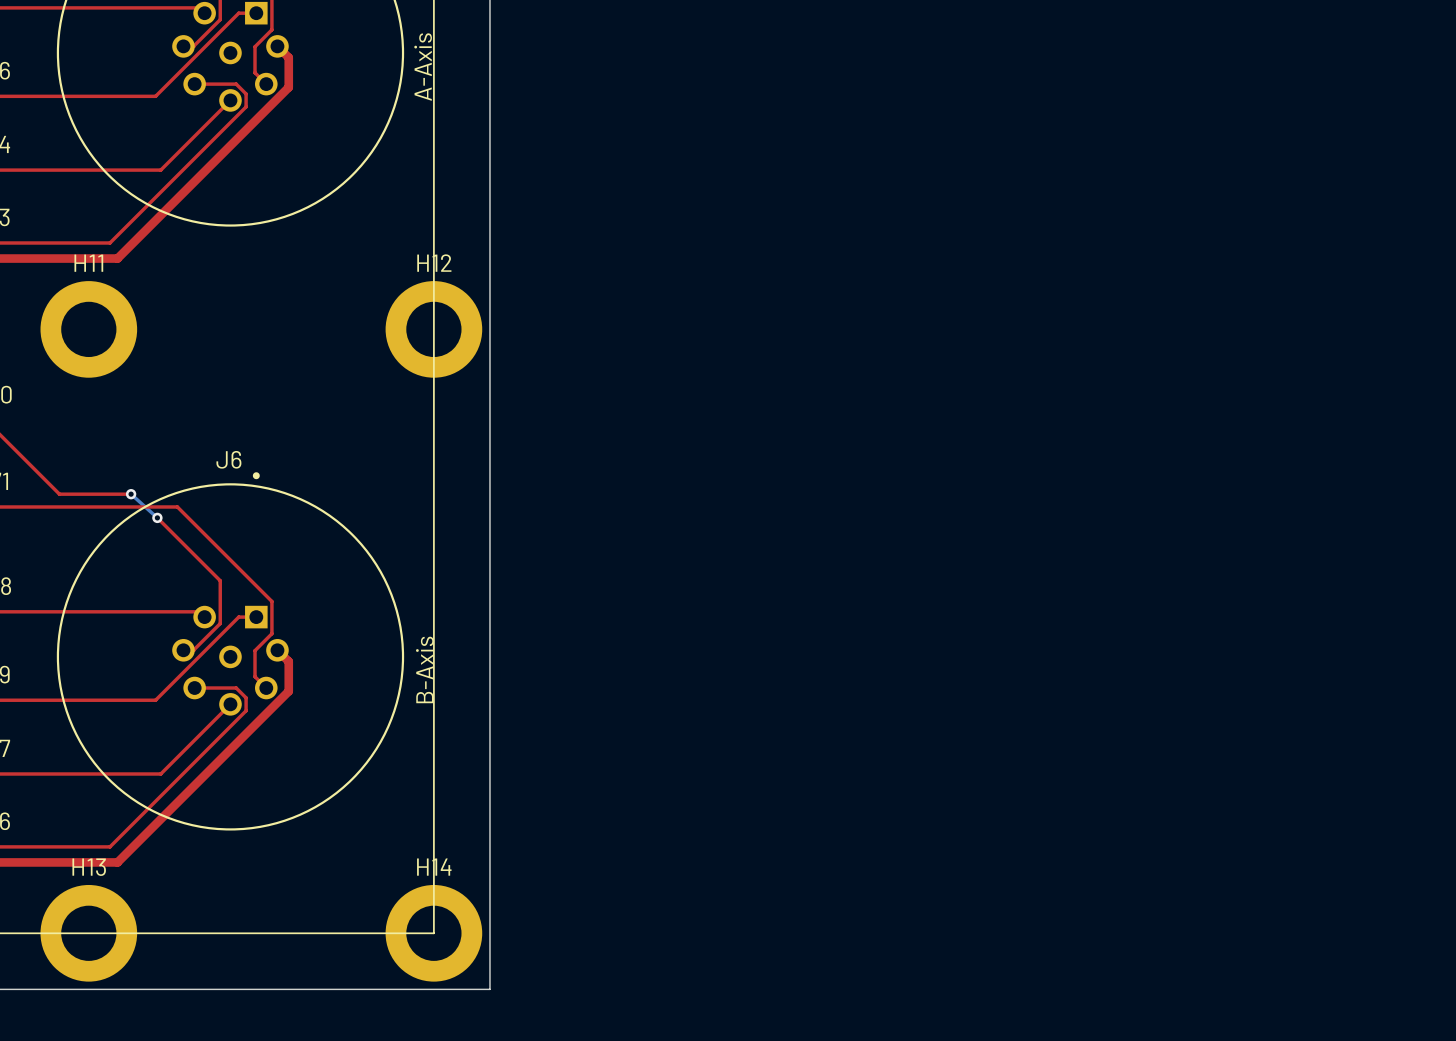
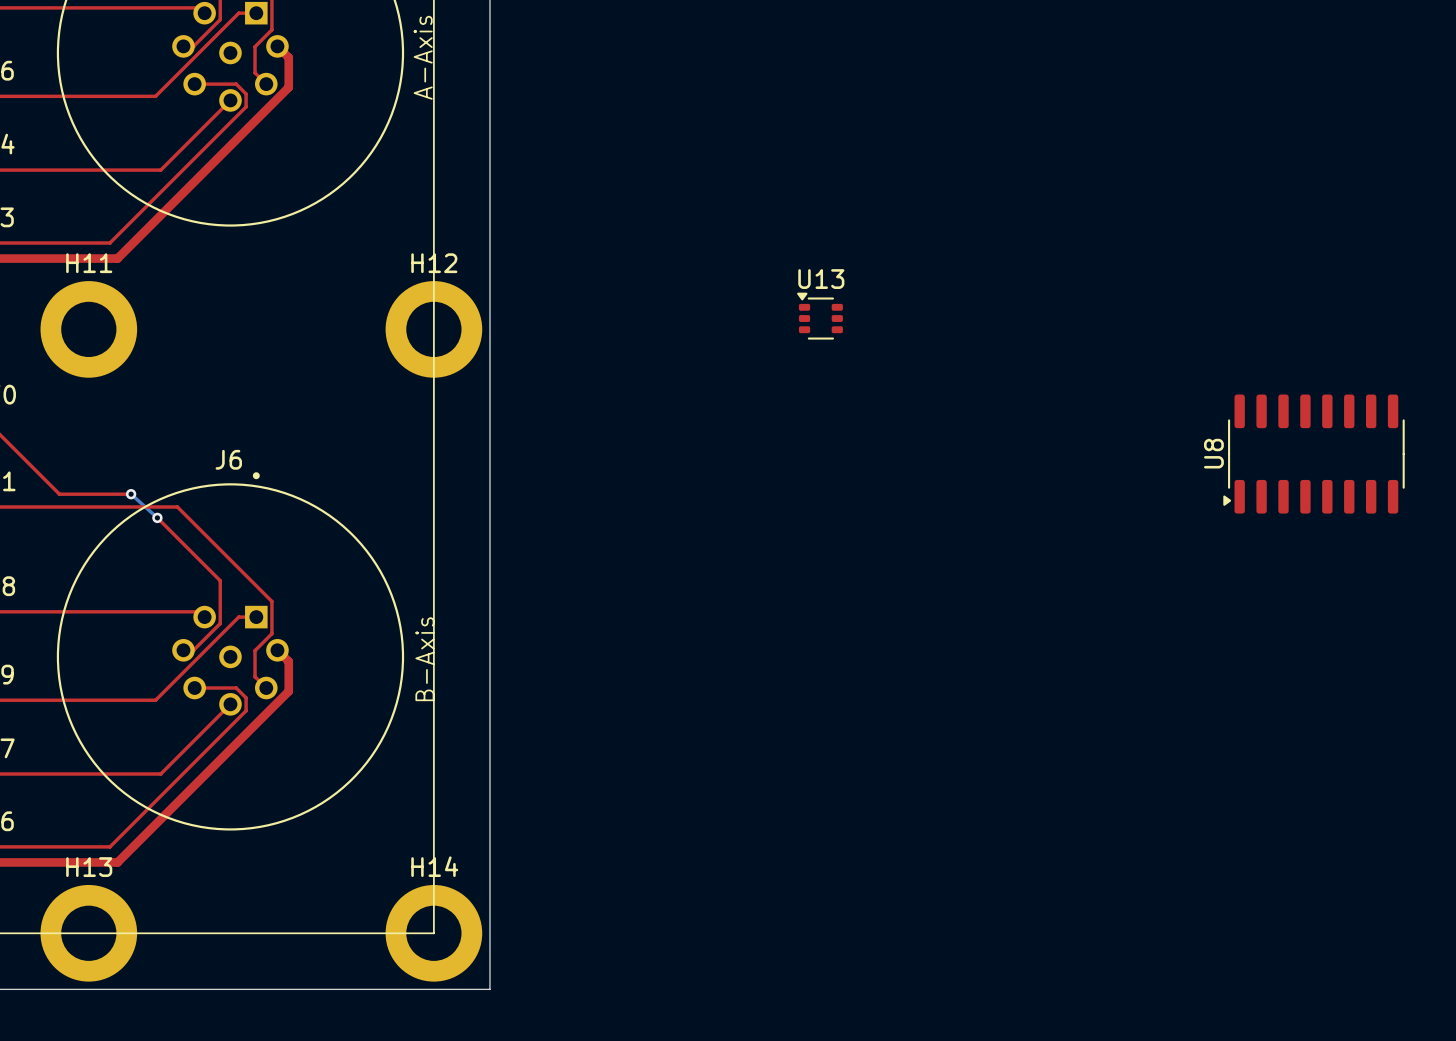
U13: none -> (820, 316)
U8: none -> (1314, 454)

